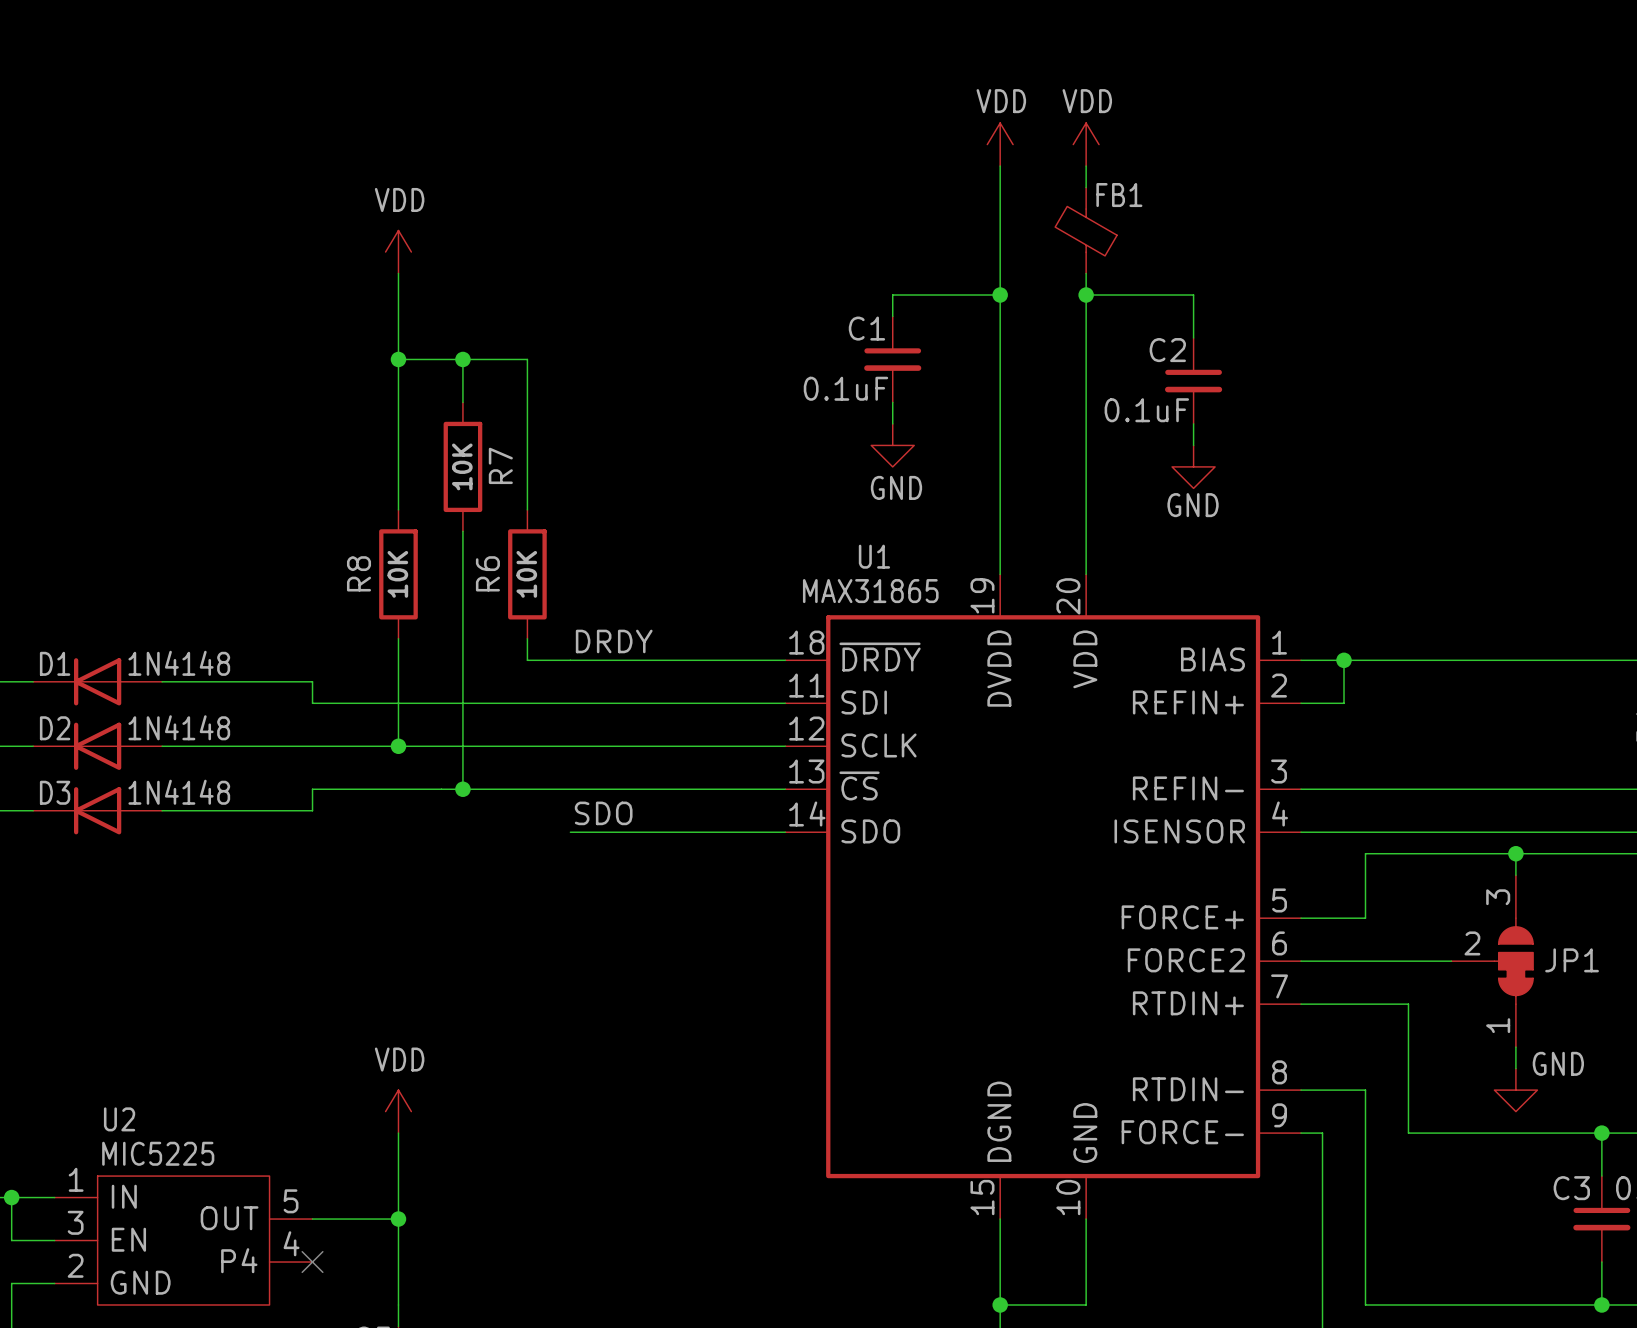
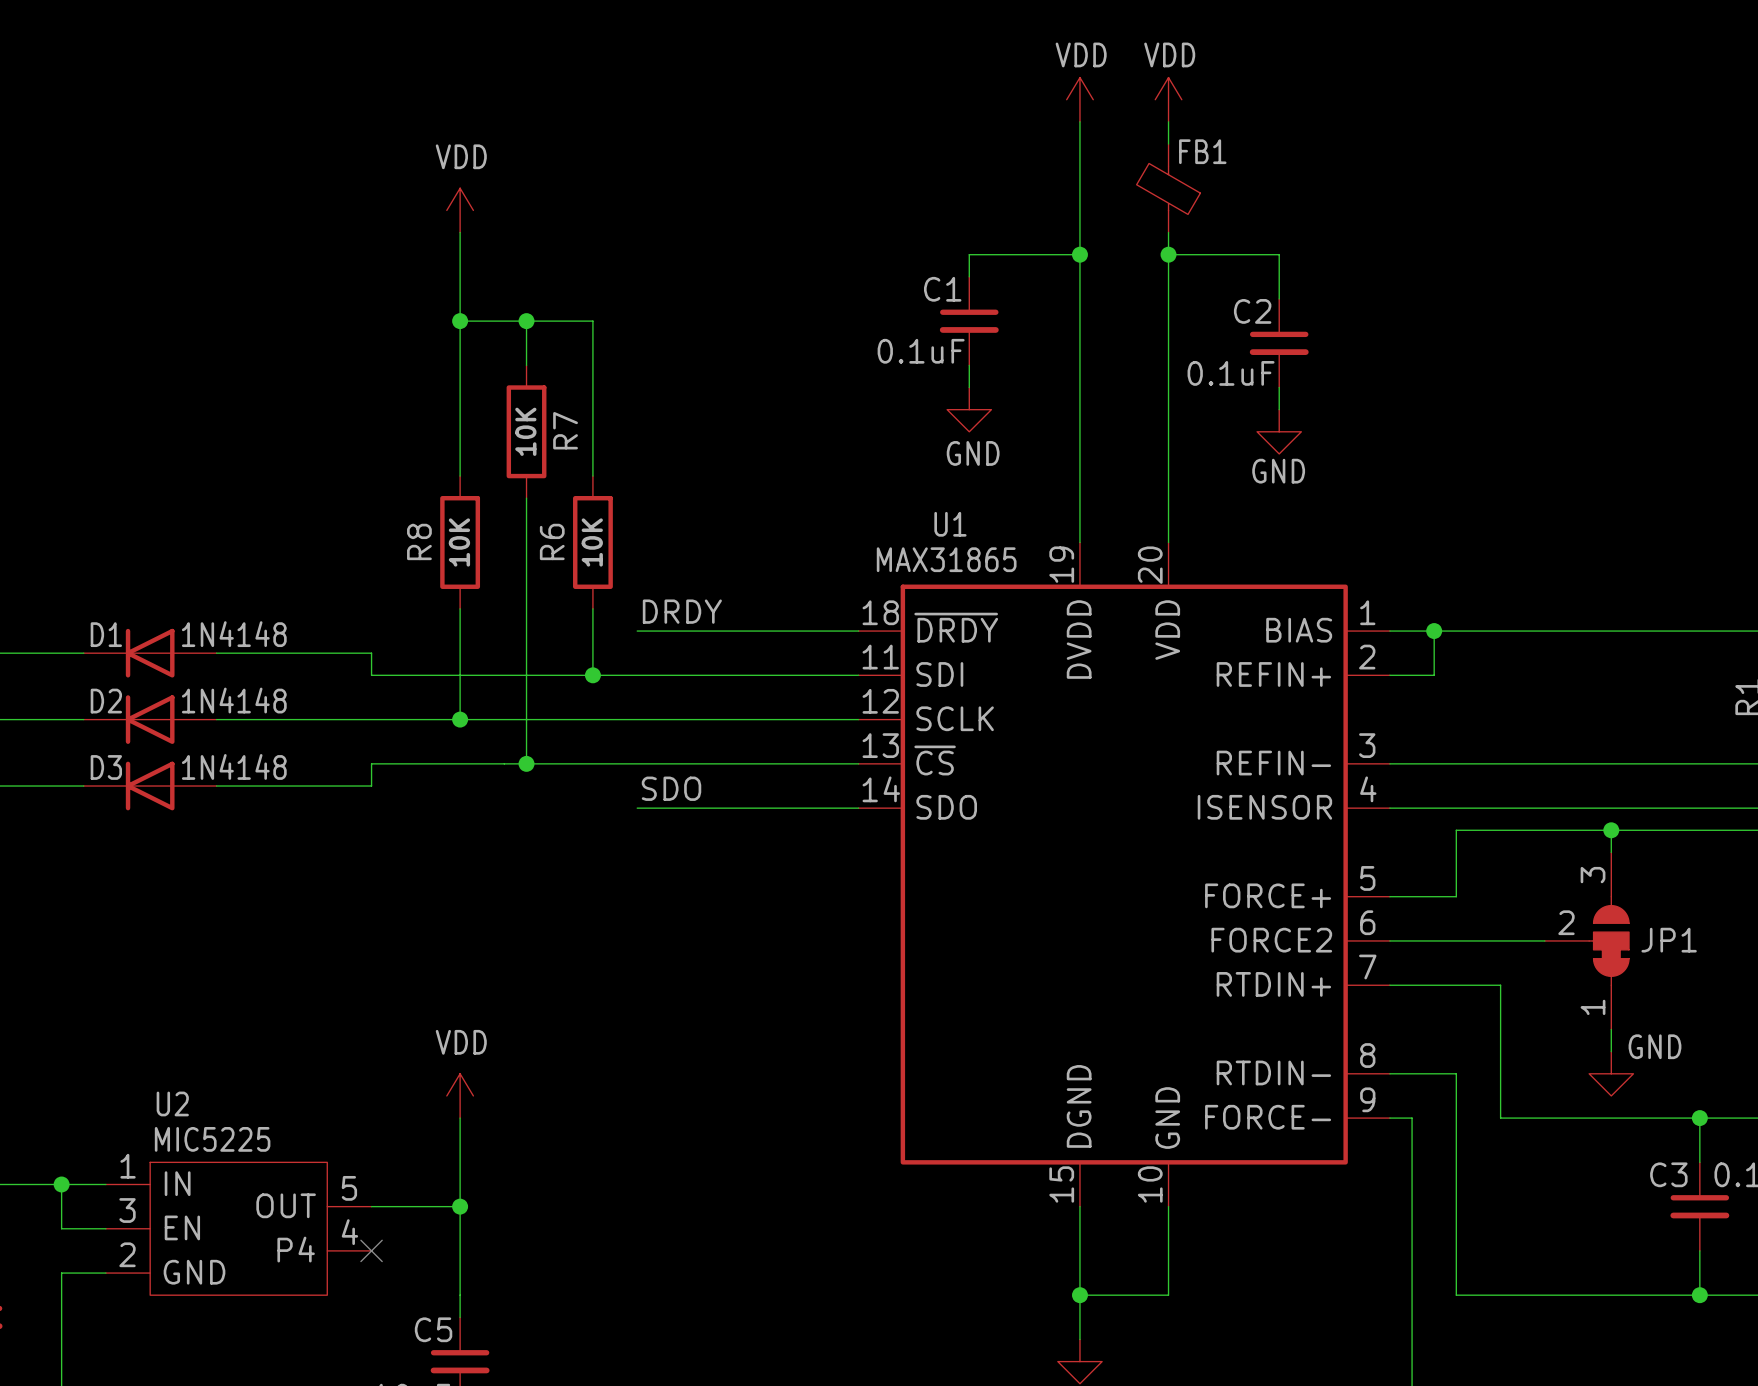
wire: (527, 660) (570, 660) -> (592, 631) (592, 675)
junction: none -> (592, 675)

